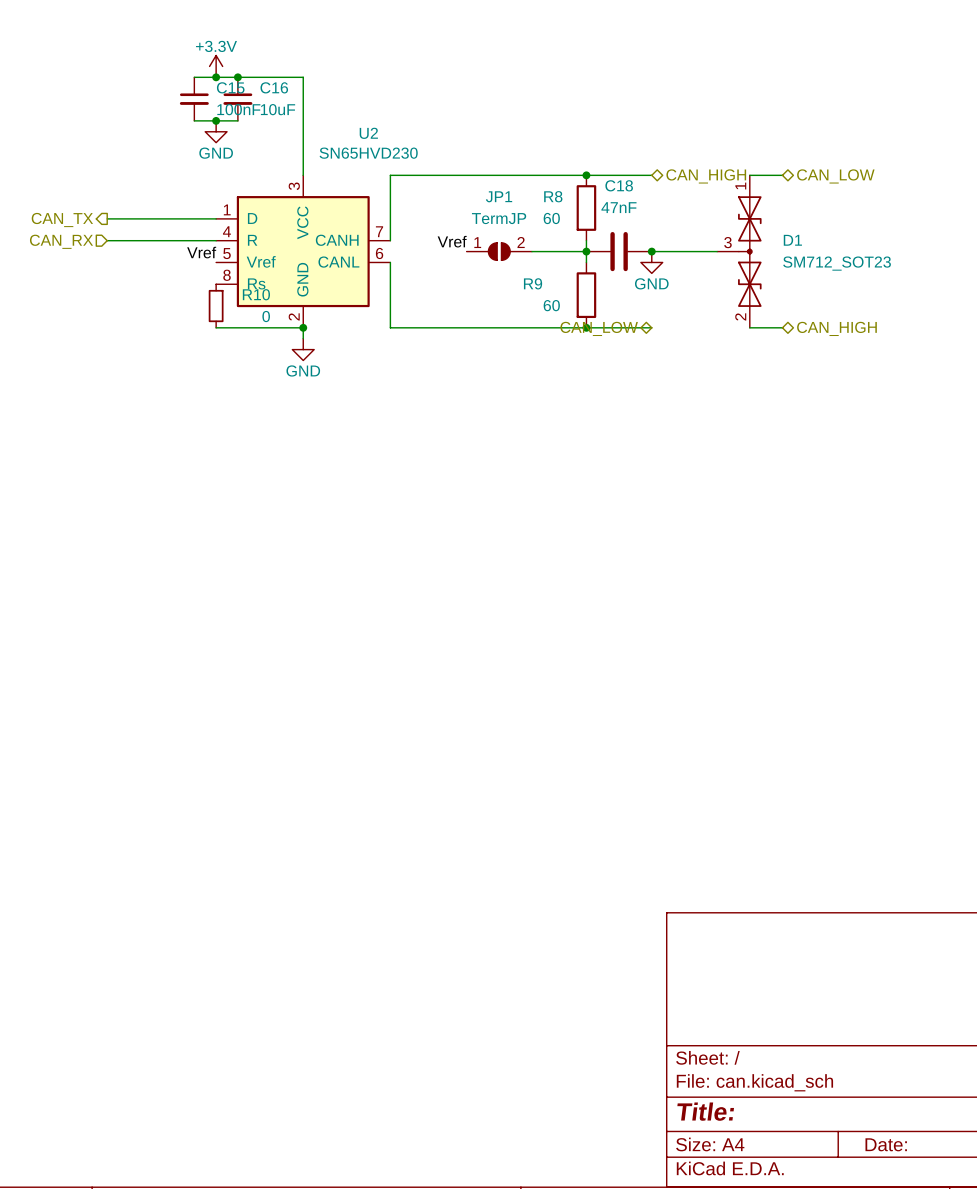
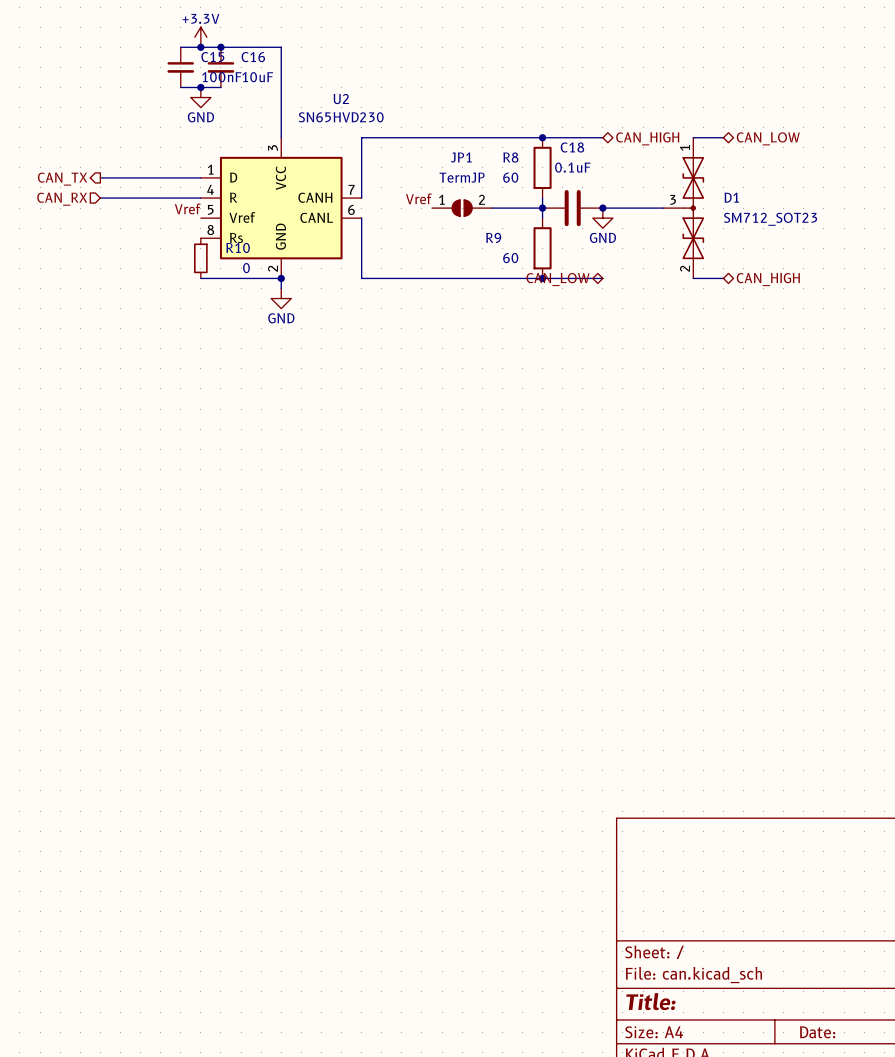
C18 value: 47nF (618, 207) -> 0.1uF (572, 167)

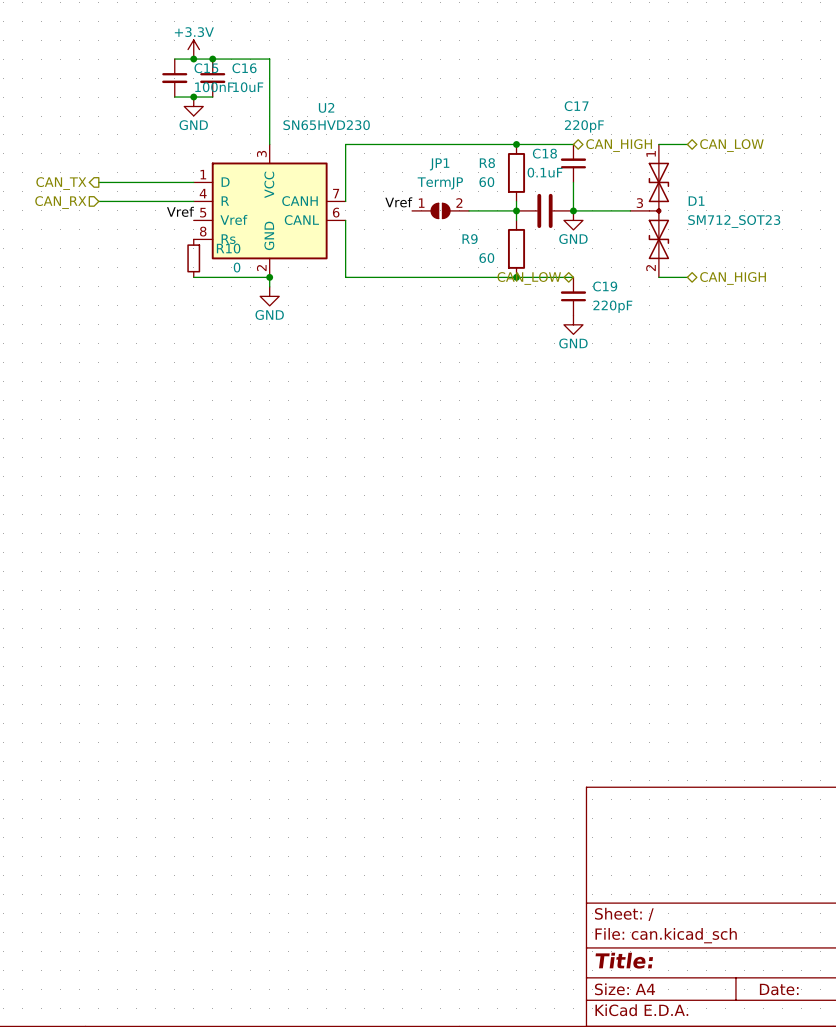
C17: none -> 220pF (573, 163)
wire: none -> (573, 182) (573, 210)
C19: none -> 220pF (573, 296)
power symbol: none -> GND (573, 324)

